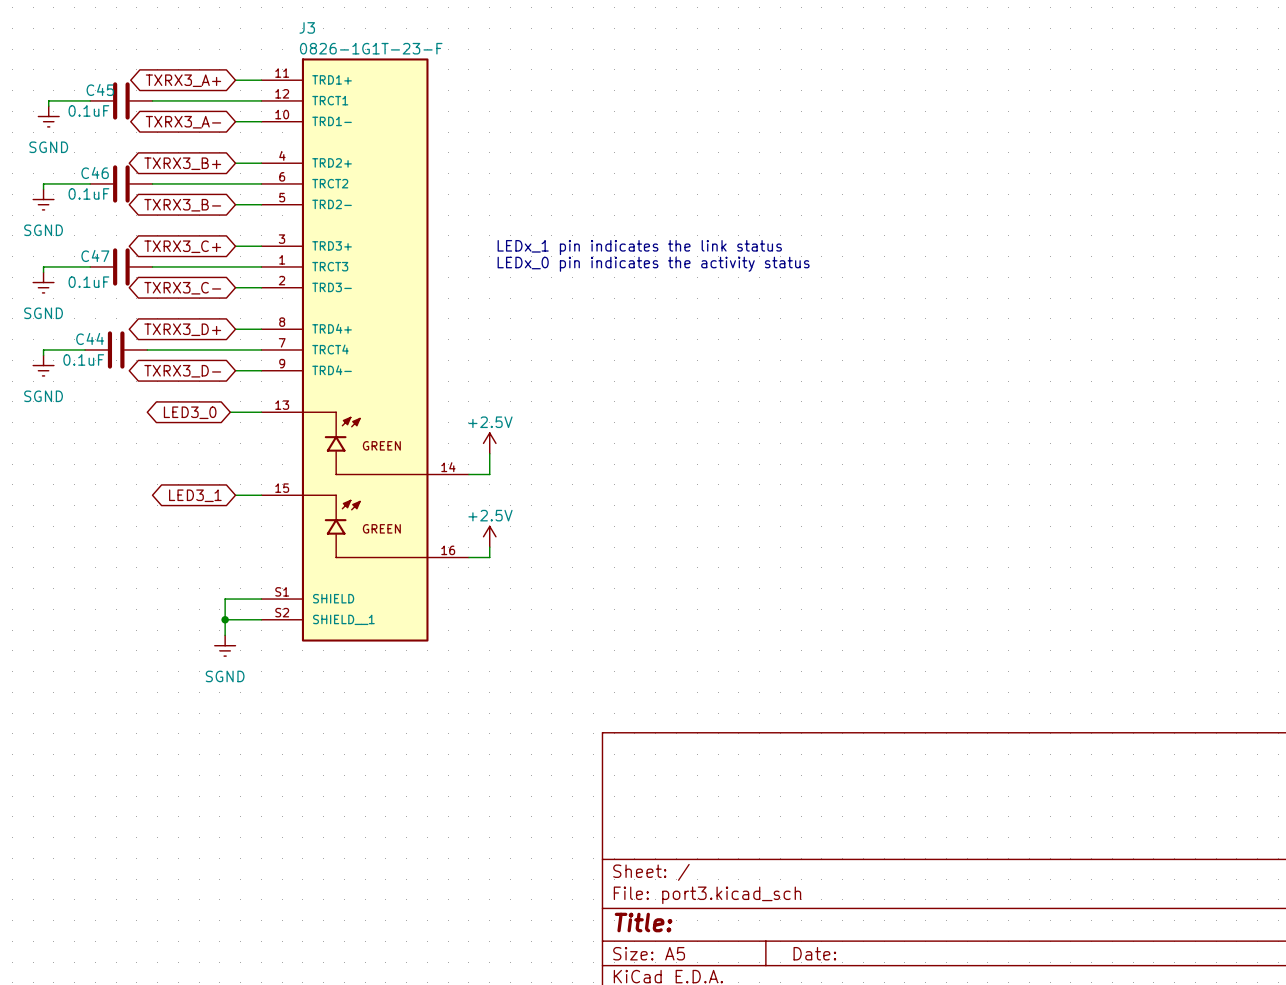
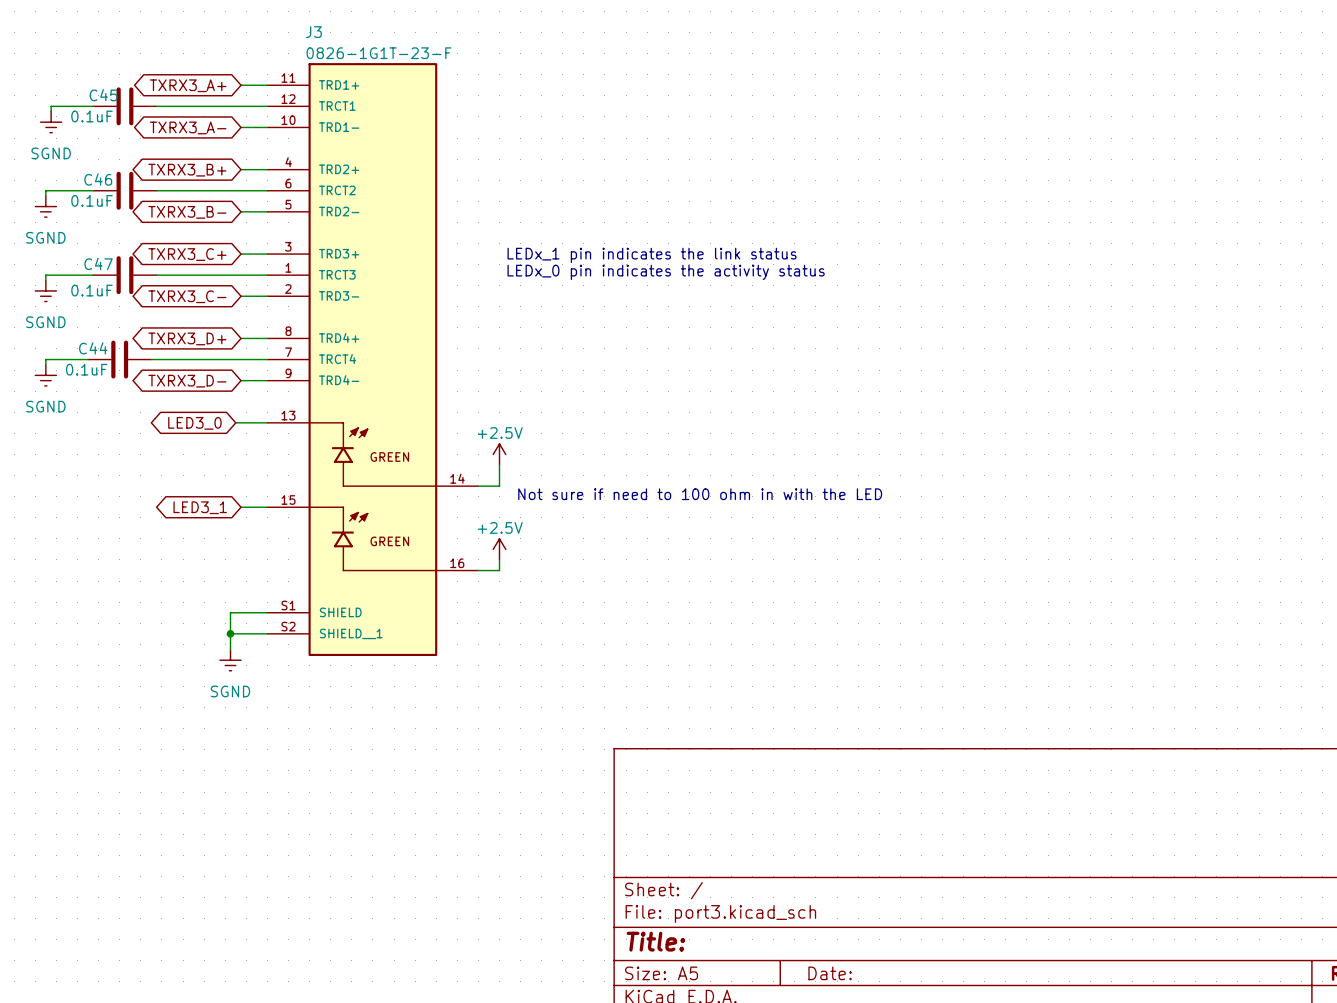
text: none -> Not sure if need to 100 ohm in with the LED (700, 494)

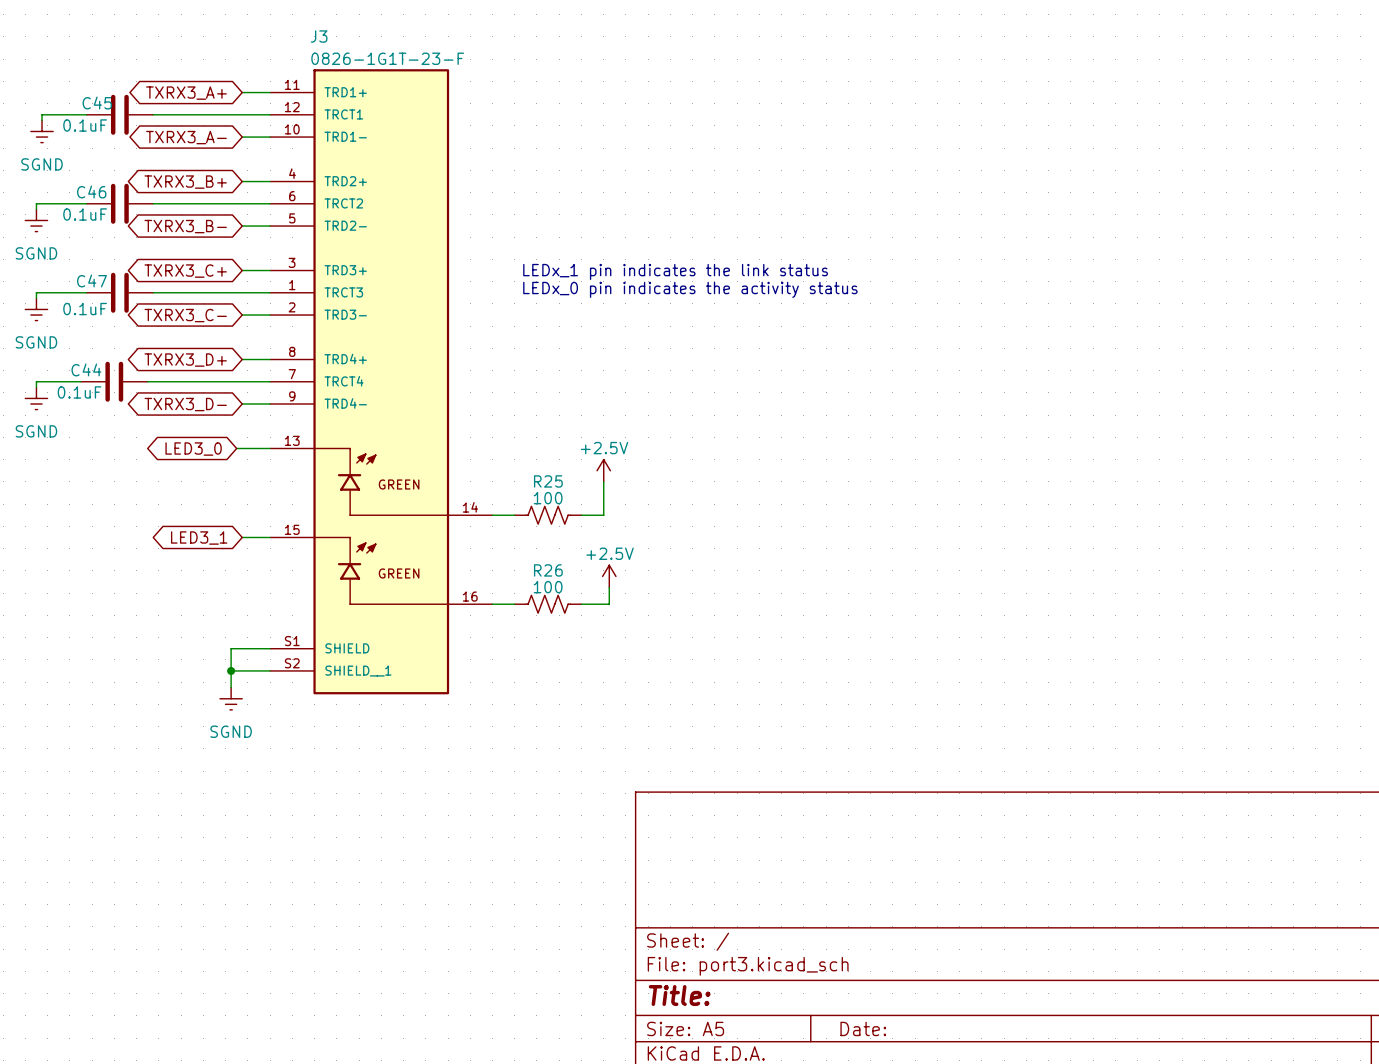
power symbol: none -> +2.5V (603, 470)
power symbol: +2.5V (499, 454) -> none
wire: none -> (603, 481) (603, 515) (581, 515)
wire: (499, 465) (499, 486) -> none
R25: none -> 100 (548, 515)
text: Not sure if need to 100 ohm in with the LED (700, 494) -> none
power symbol: none -> +2.5V (609, 576)
power symbol: +2.5V (499, 549) -> none
wire: none -> (609, 587) (609, 604) (581, 604)
wire: (499, 559) (499, 570) -> none
R26: none -> 100 (548, 604)

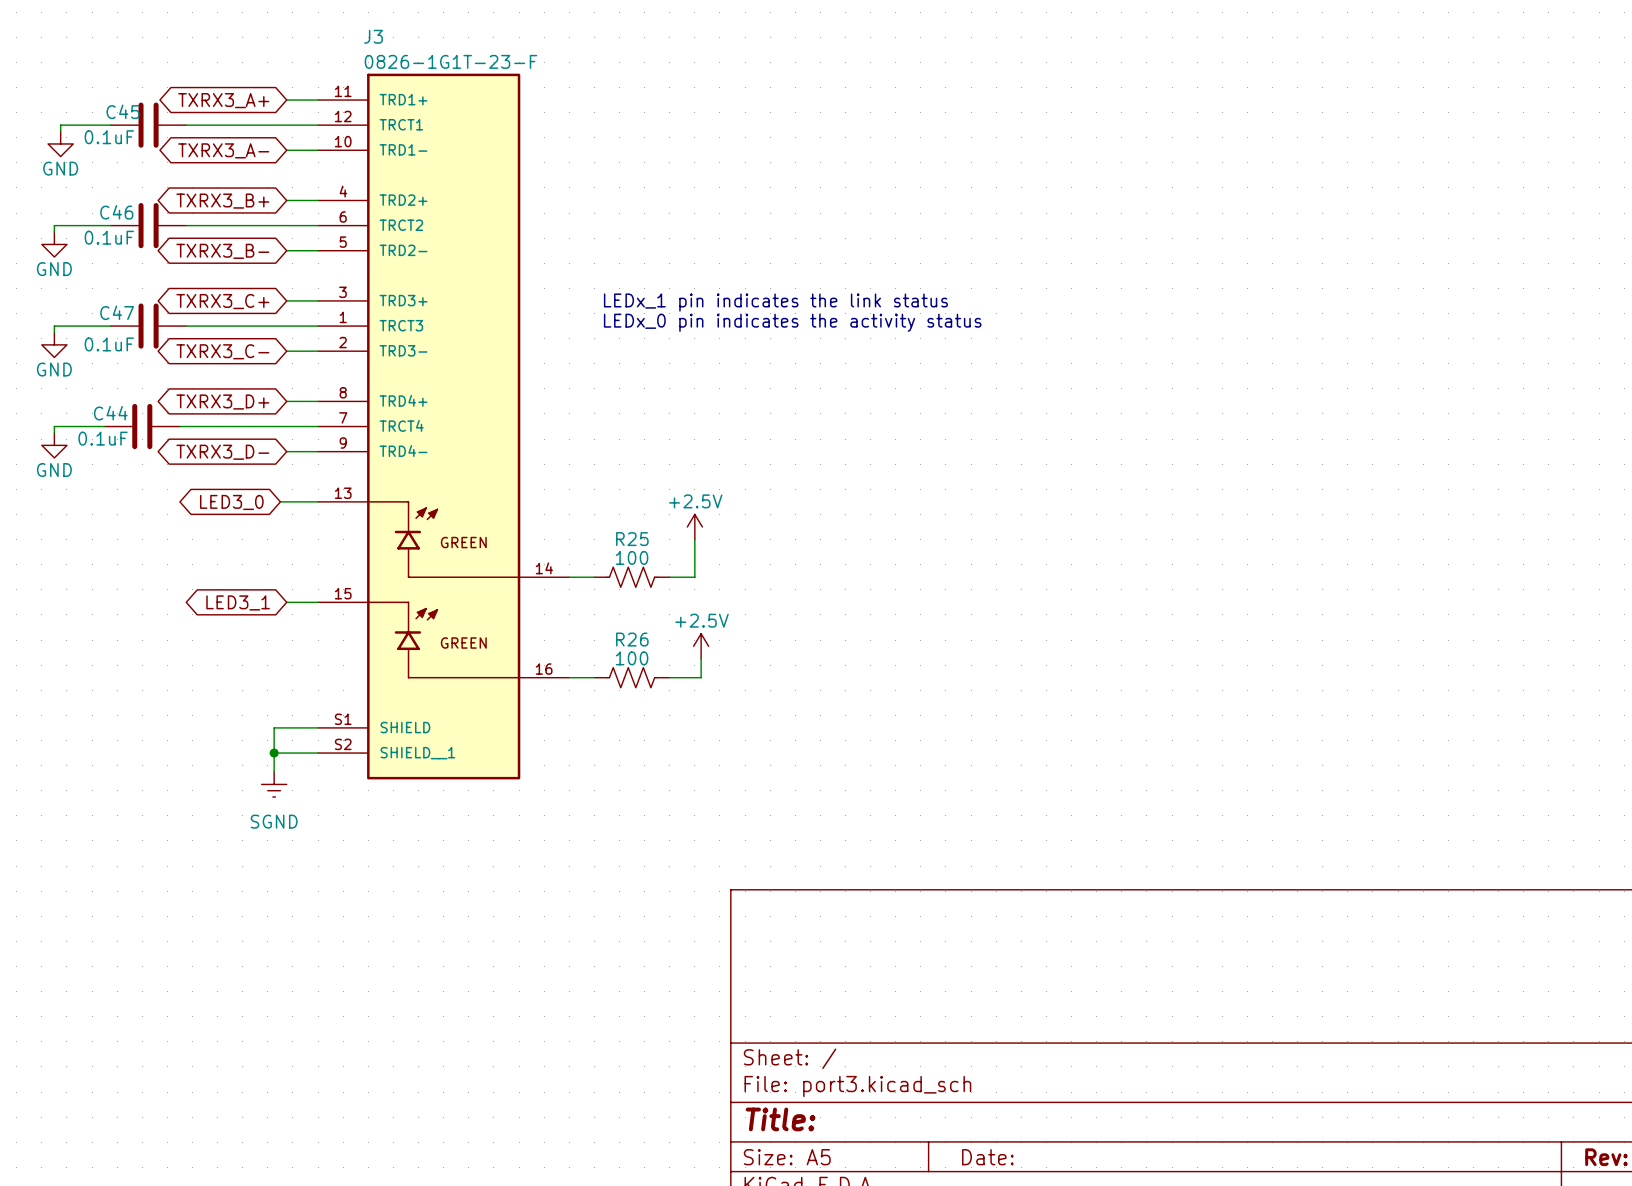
power symbol: SGND (42, 131) -> GND (60, 143)
power symbol: SGND (36, 220) -> GND (54, 244)
power symbol: SGND (36, 309) -> GND (54, 344)
power symbol: SGND (36, 398) -> GND (54, 445)

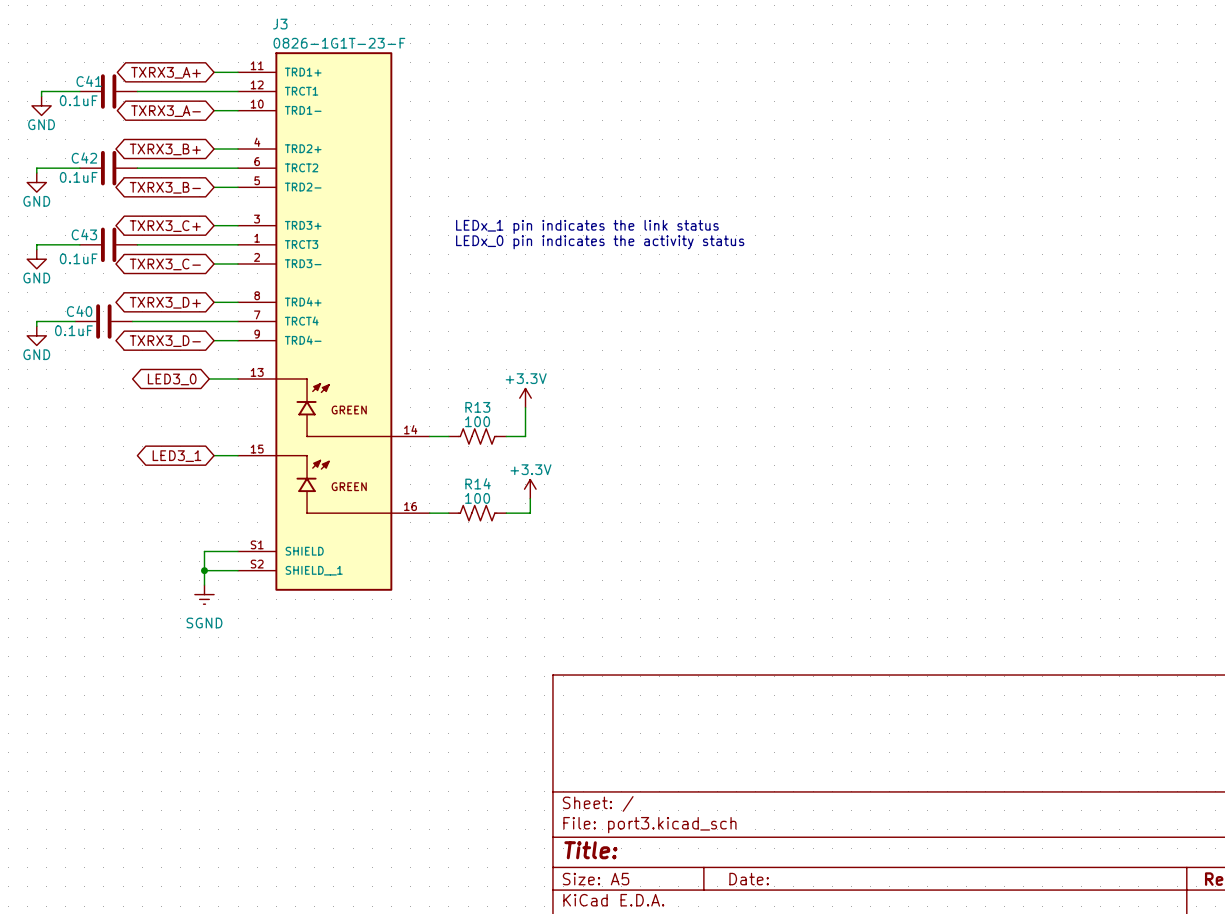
C45 name: C45 (123, 111) -> C41 (89, 81)
C46 name: C46 (116, 212) -> C42 (84, 158)
C47 name: C47 (117, 312) -> C43 (84, 234)
C44 name: C44 (110, 413) -> C40 (79, 311)
power symbol: +2.5V (694, 526) -> +3.3V (525, 398)
R25 name: R25 (632, 539) -> R13 (477, 407)
R26 name: R26 (632, 639) -> R14 (478, 483)
power symbol: +2.5V (701, 646) -> +3.3V (530, 489)

